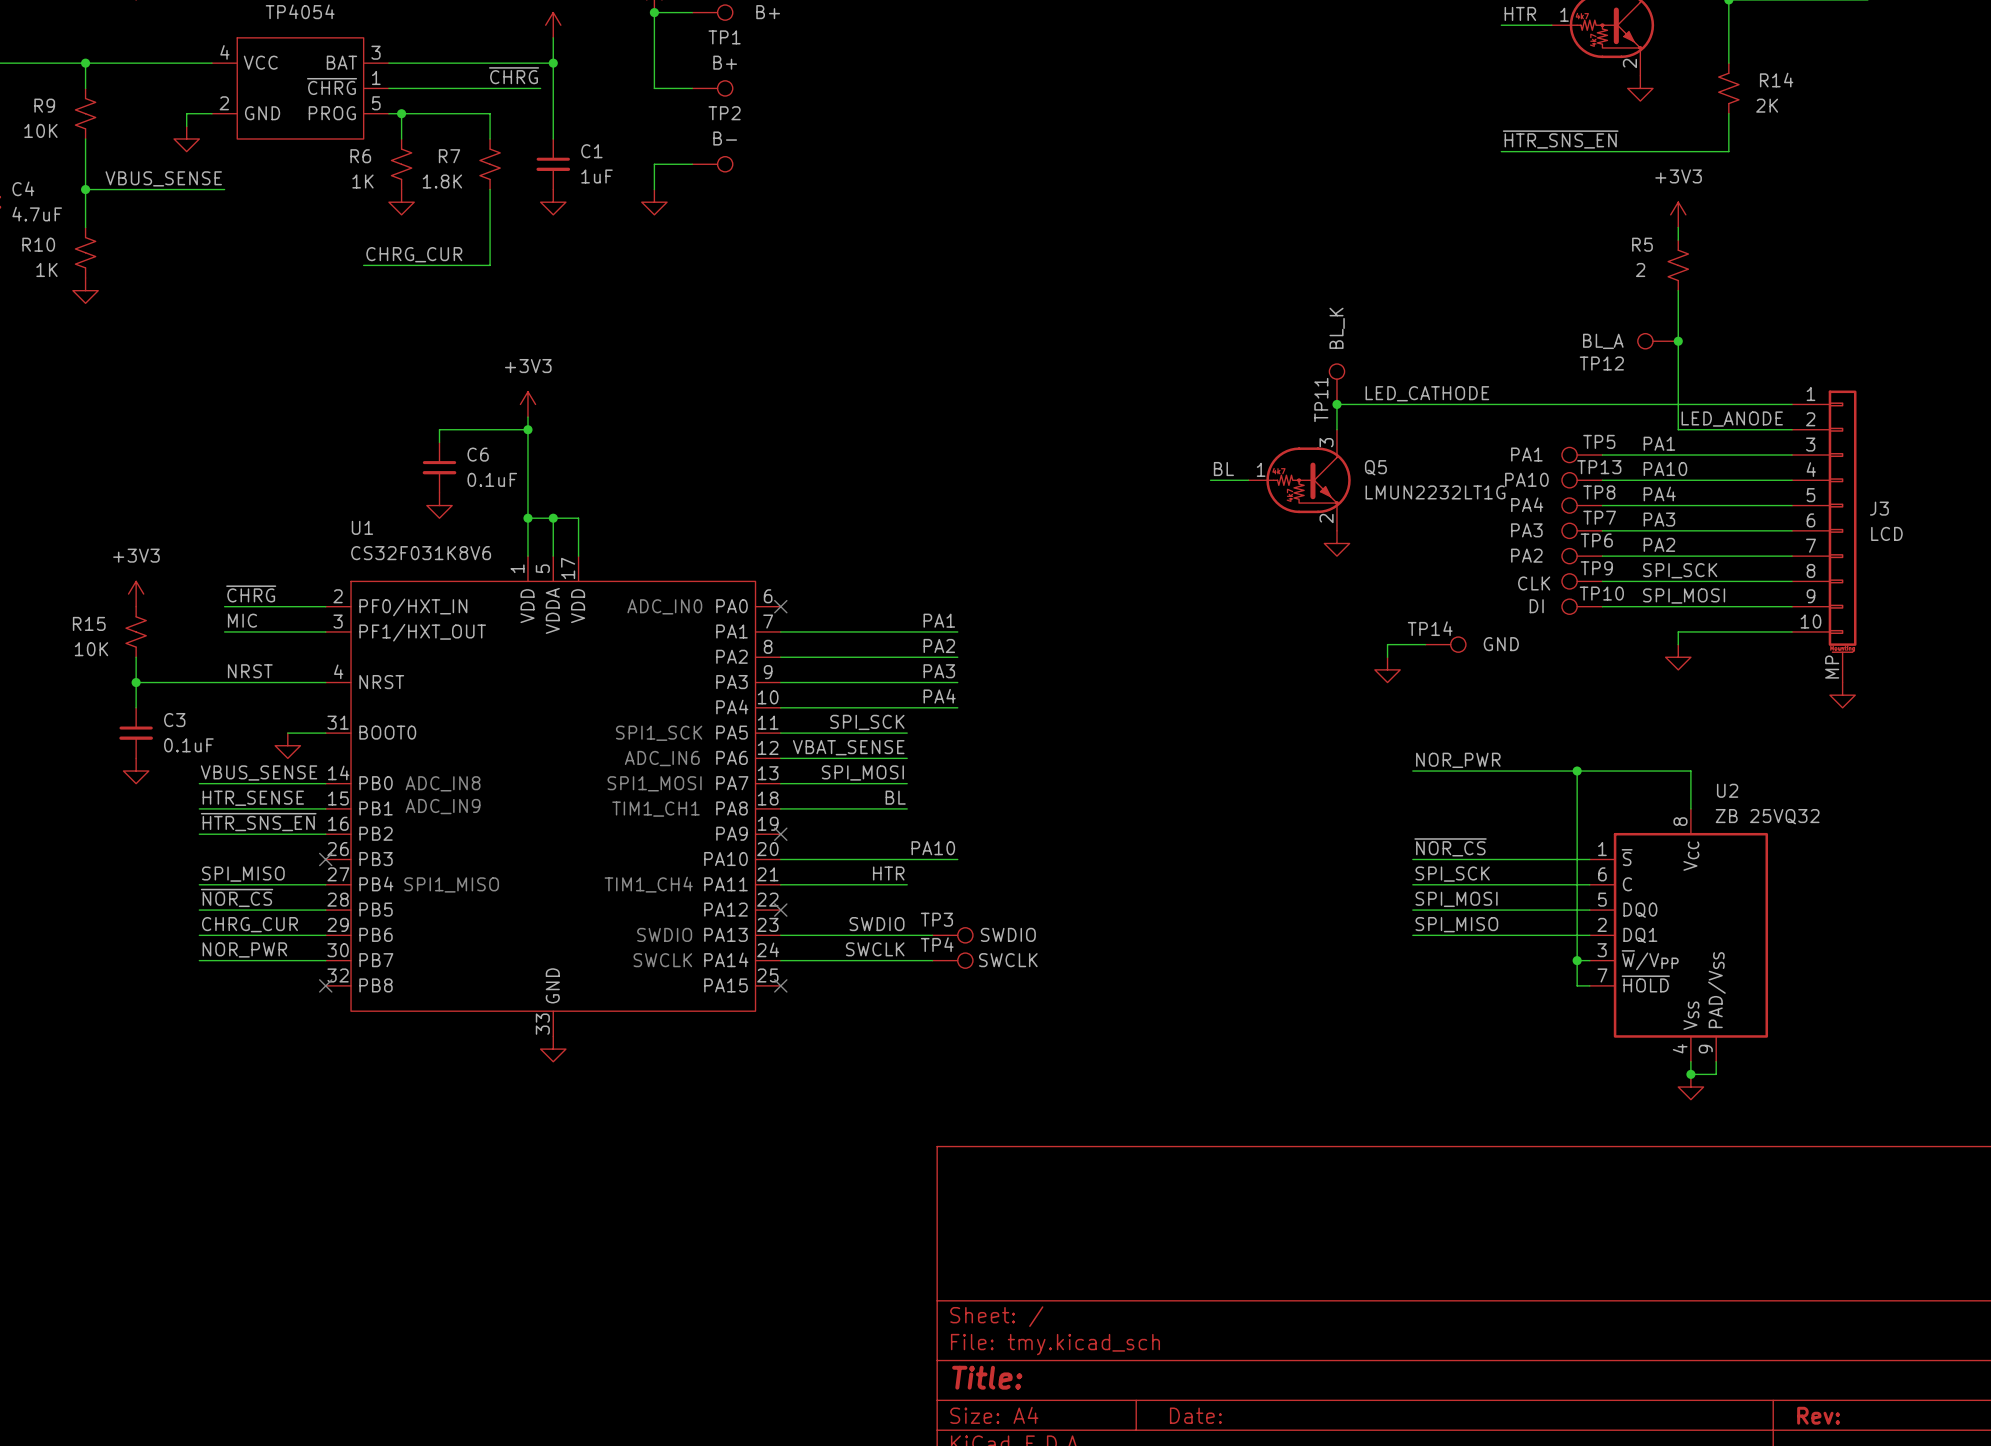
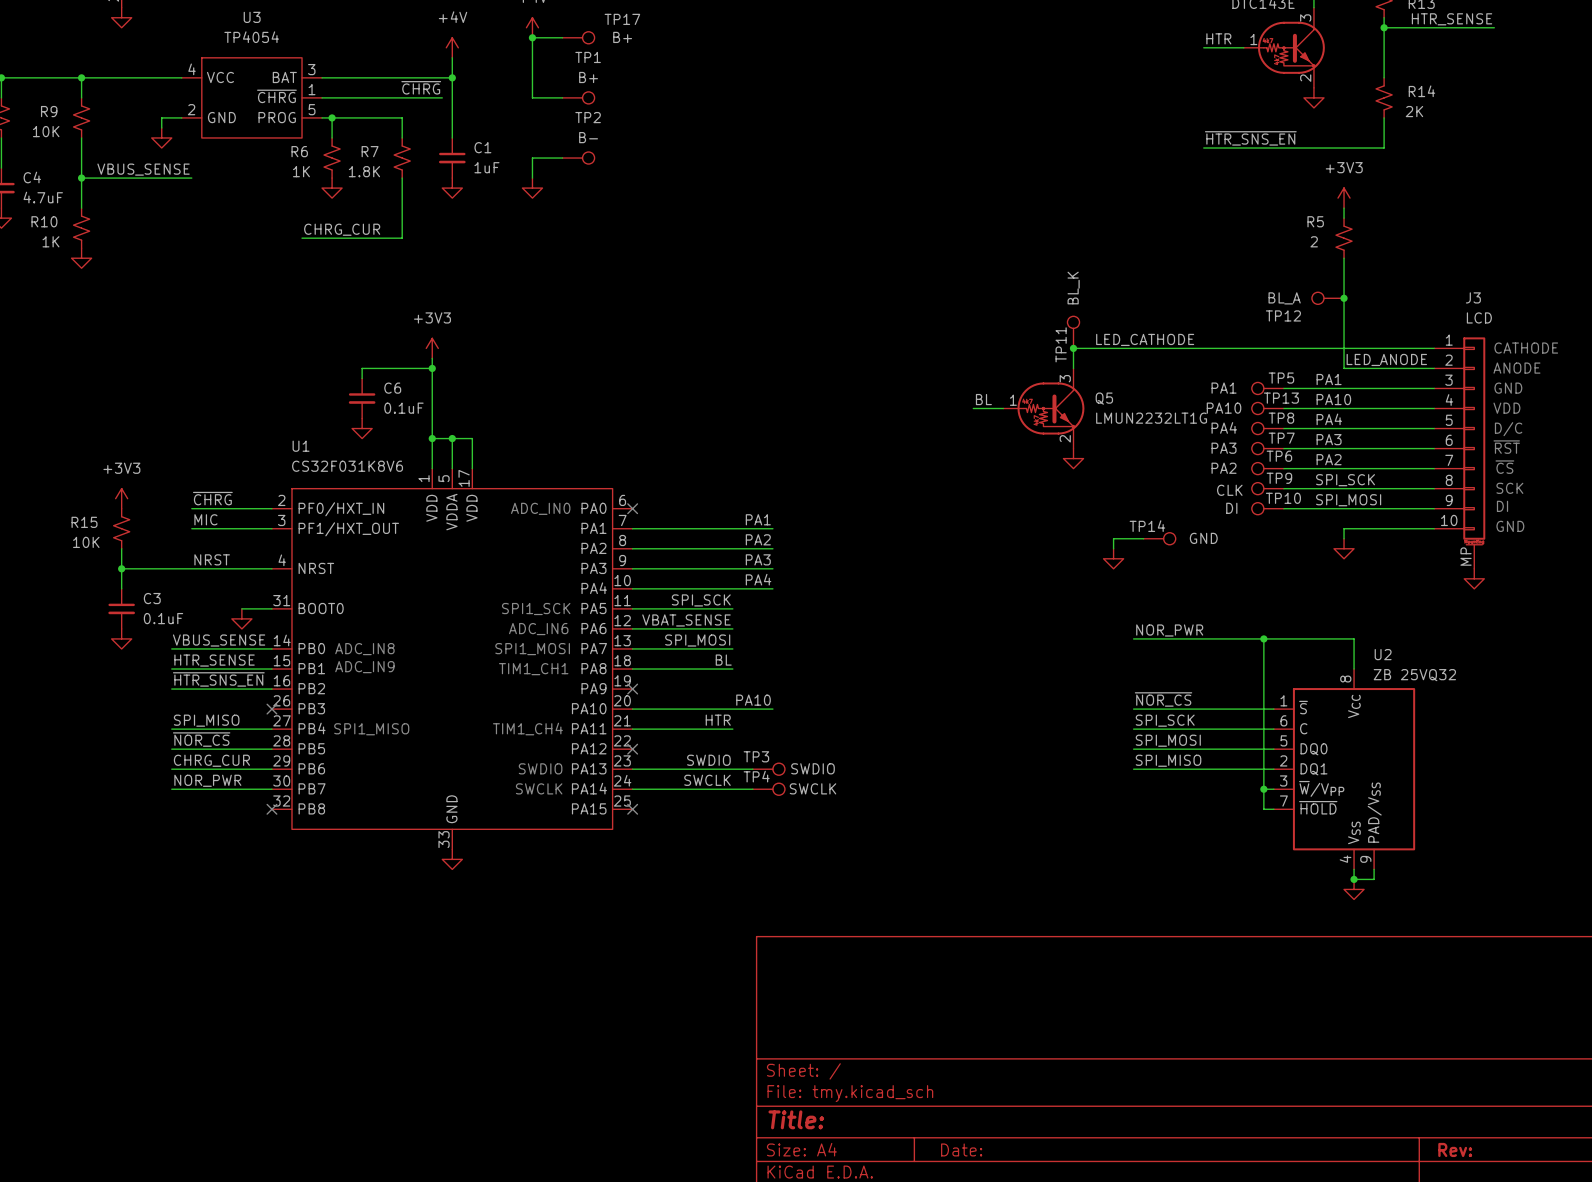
text: none -> CATHODE (1526, 348)
text: none -> ANODE (1516, 368)
text: none -> GND (1508, 388)
text: none -> VDD (1506, 408)
text: none -> D/C (1508, 429)
J3 name position: J3 (1879, 508) -> J3 (1473, 297)
text: none -> ~{RST} (1506, 447)
J3 value position: LCD (1886, 533) -> LCD (1479, 317)
text: none -> ~{CS} (1504, 467)
text: none -> SCK (1509, 488)
text: none -> DI (1502, 506)
text: none -> GND (1510, 526)

